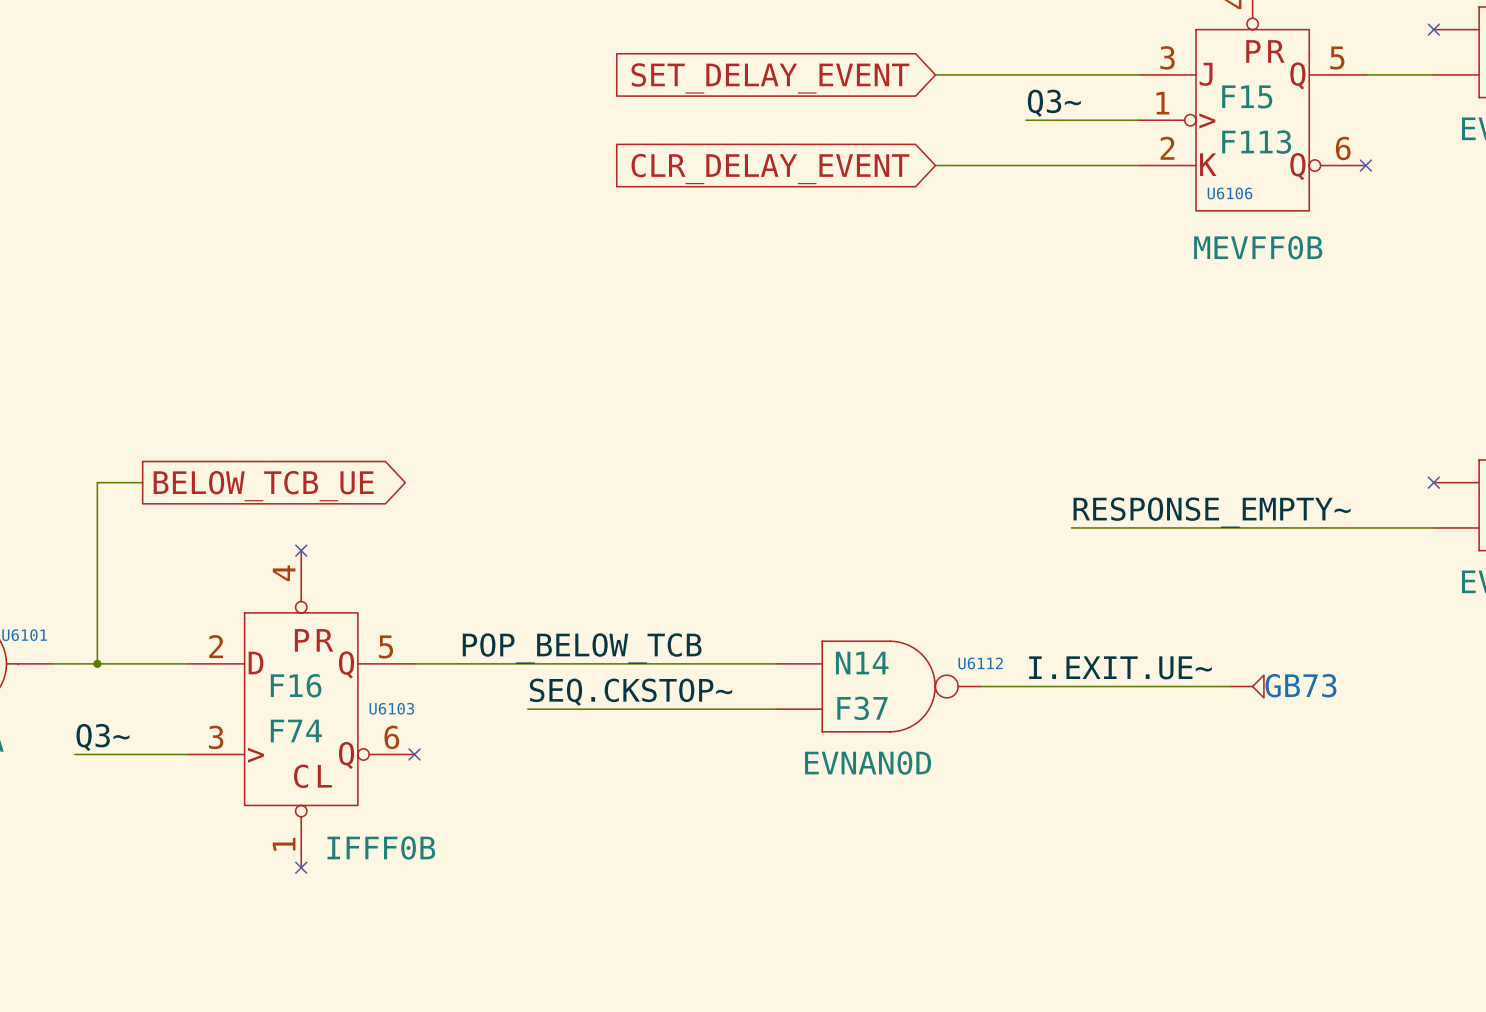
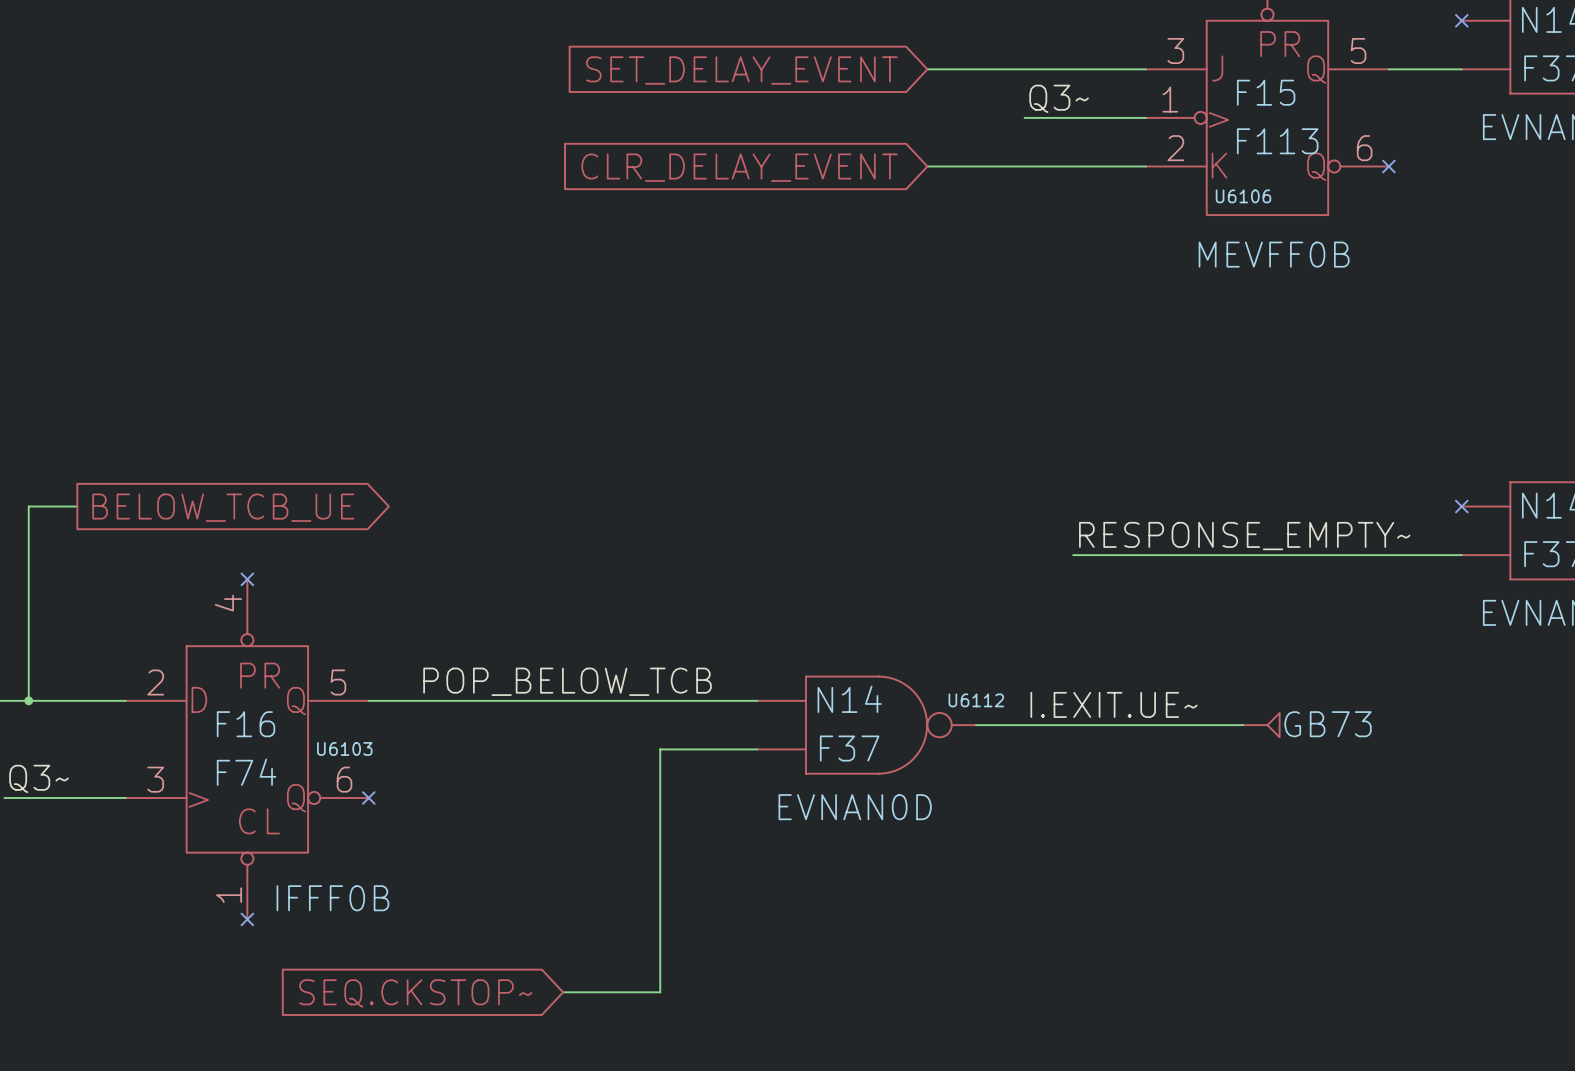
label: SEQ.CKSTOP~ (631, 692) -> none
wire: (527, 709) (686, 709) -> (563, 992) (660, 992) (660, 749)
global label: none -> SEQ.CKSTOP~ (415, 993)

